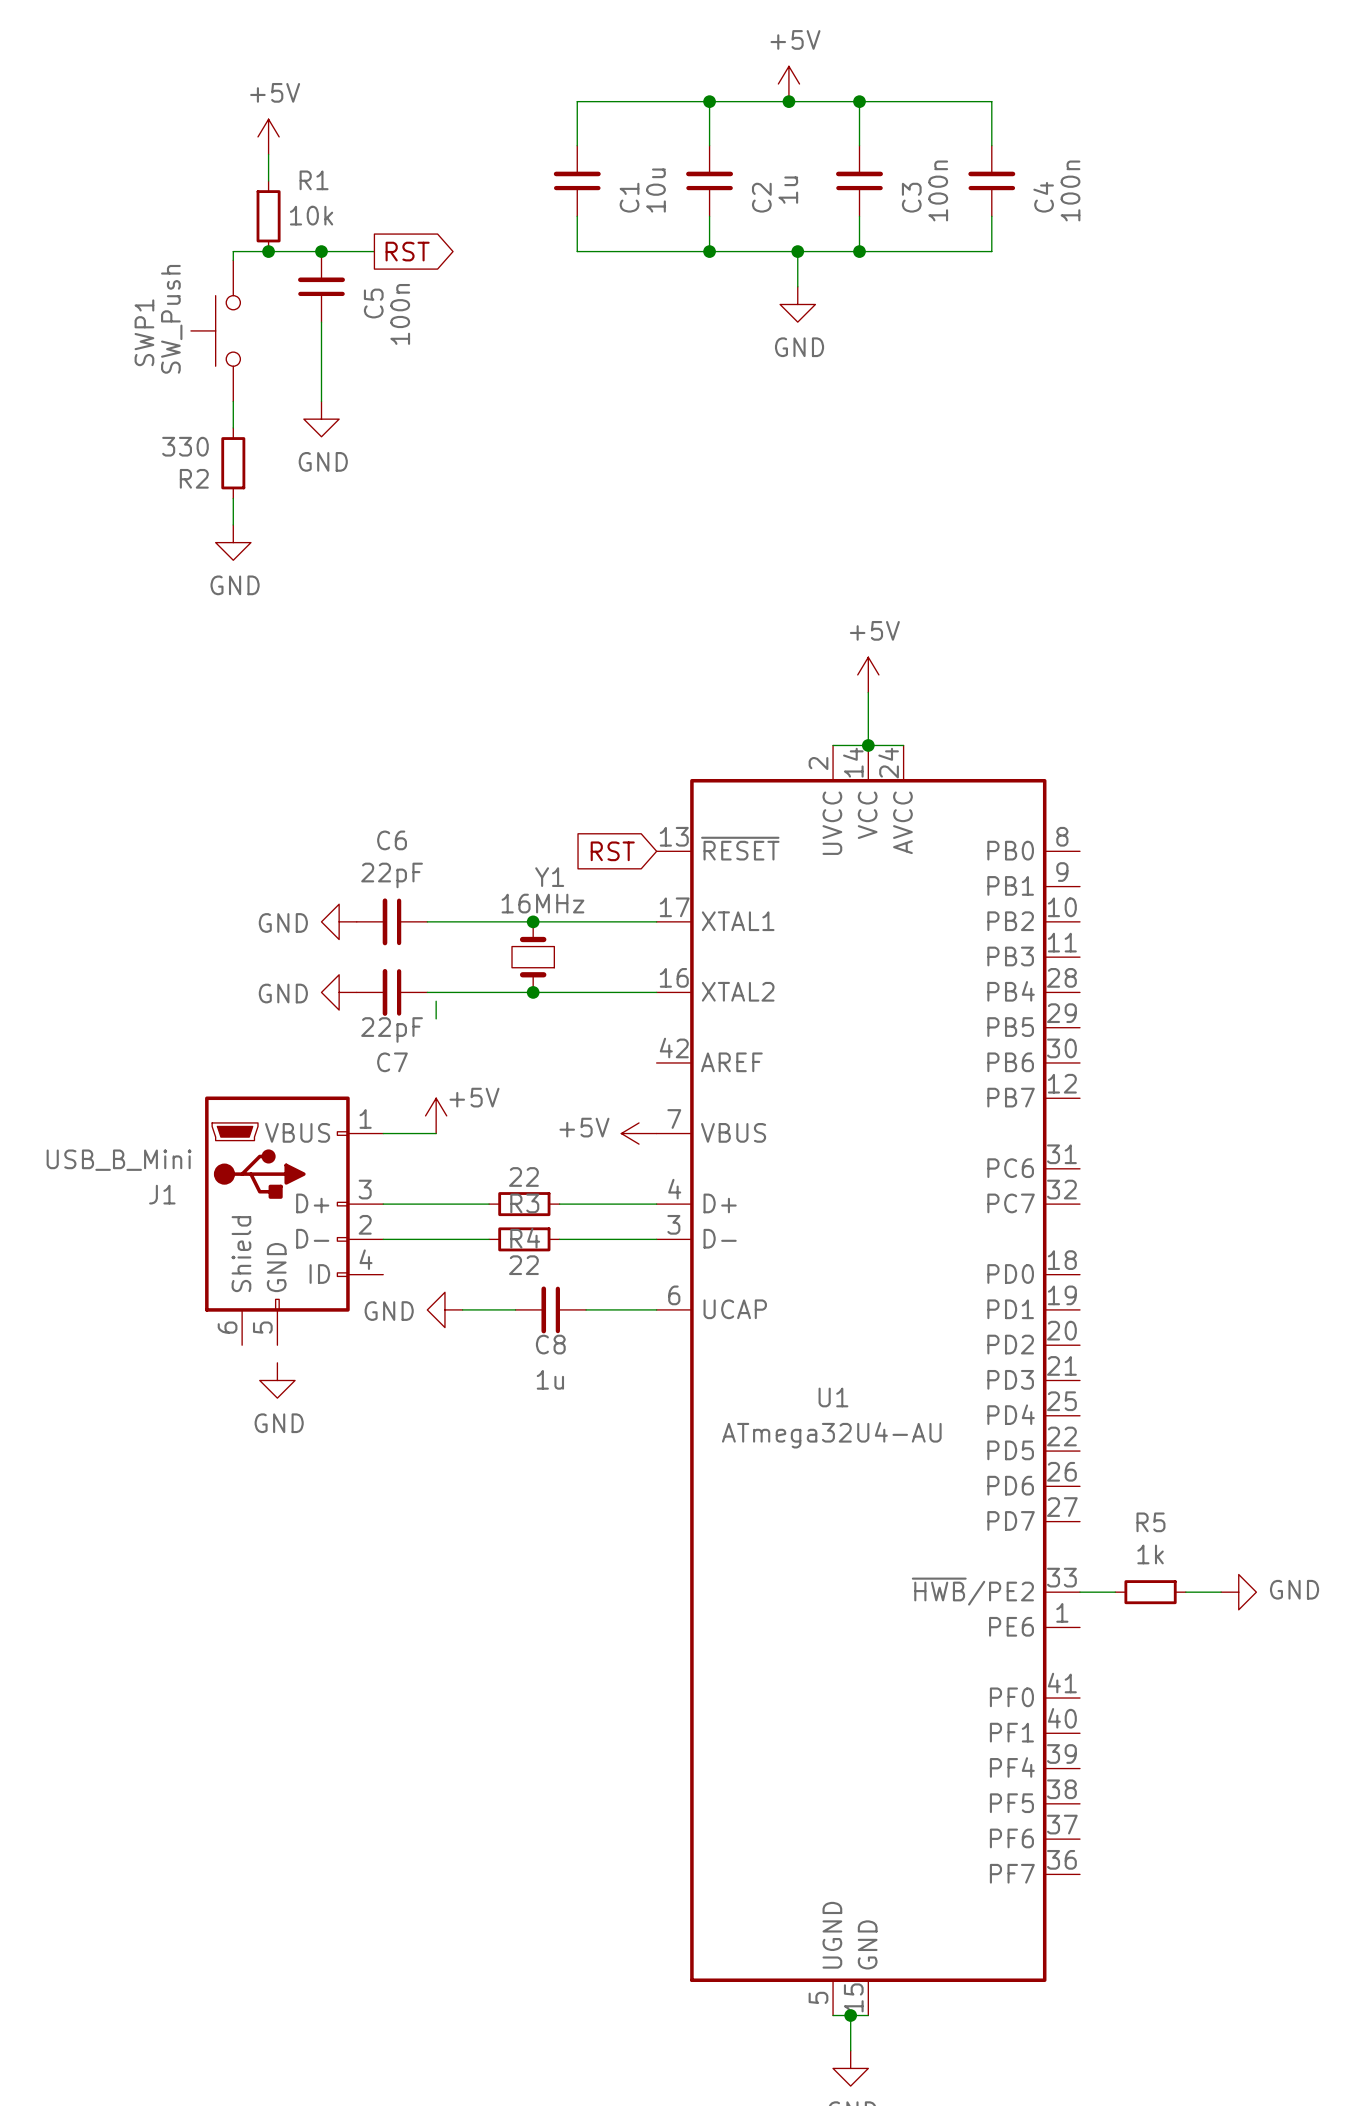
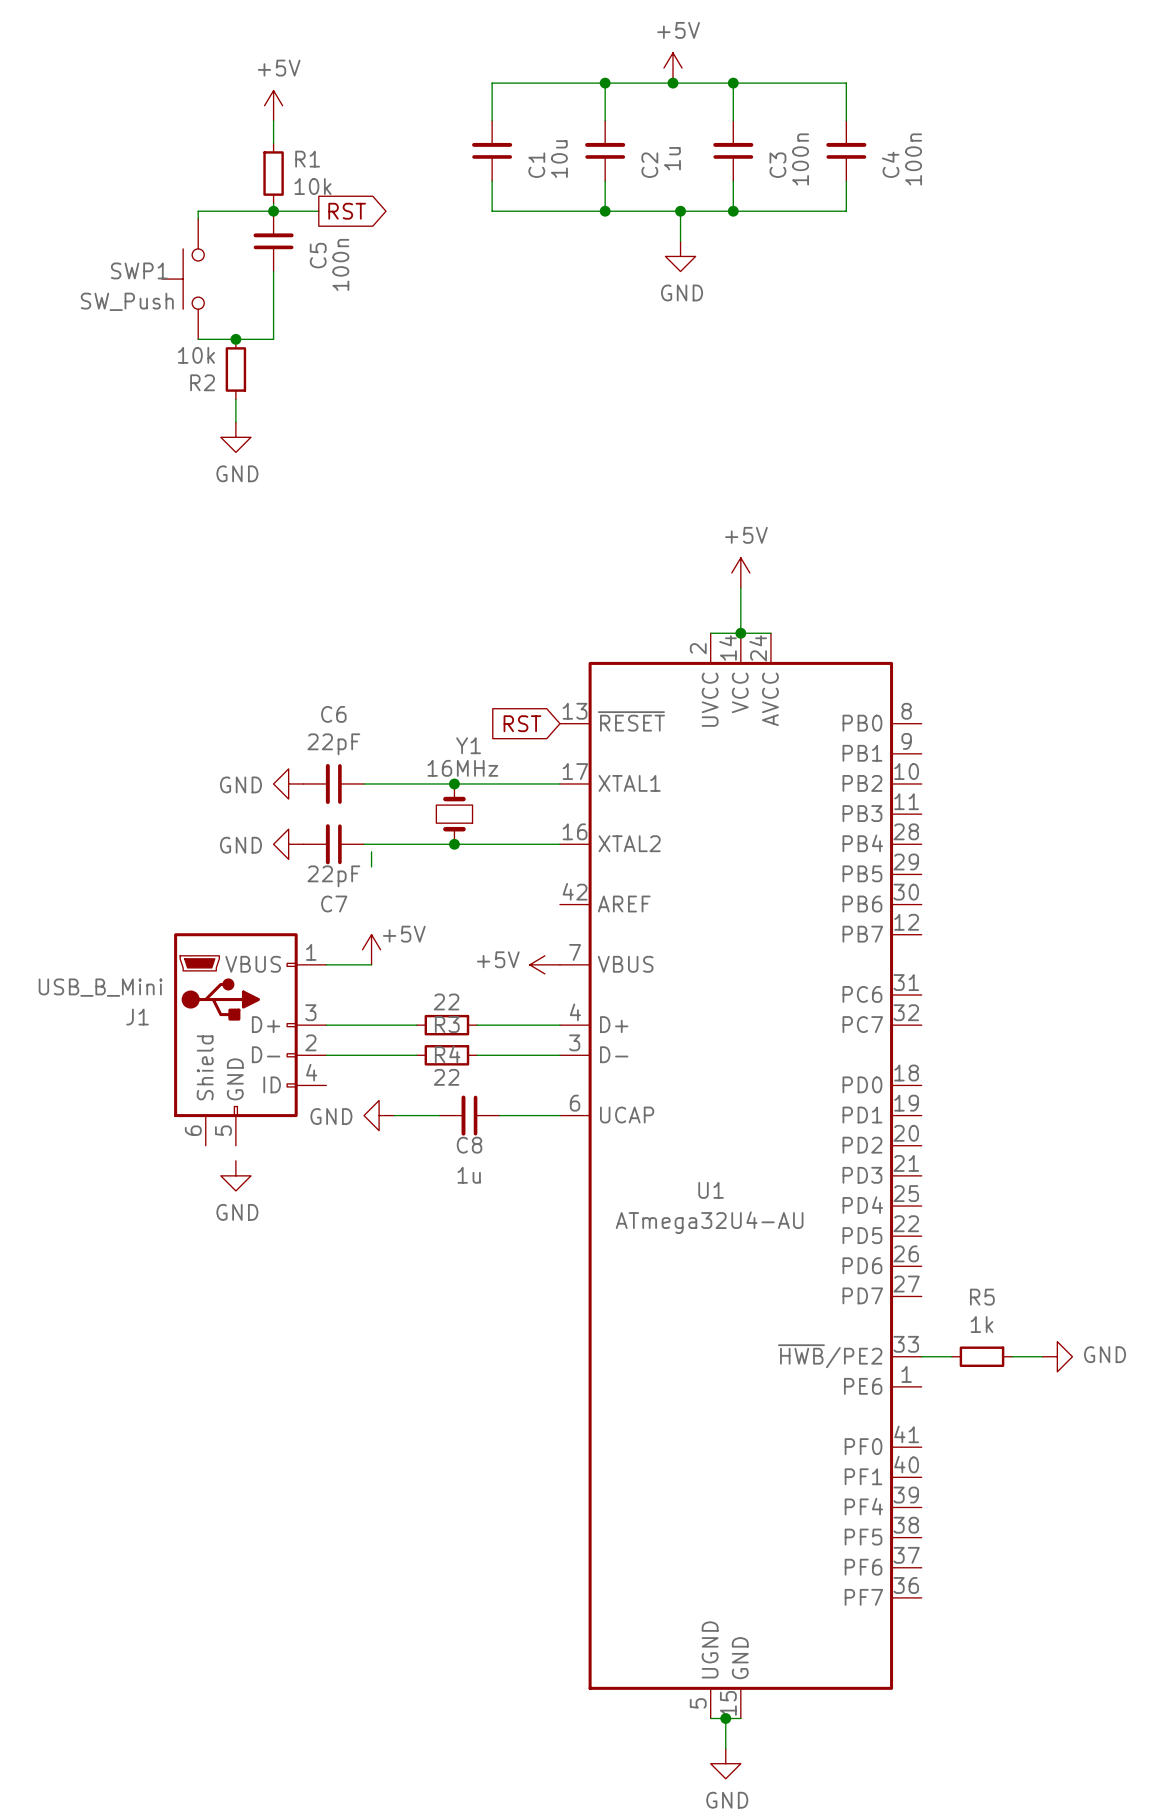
power symbol position: +5V (268, 136) -> +5V (273, 105)
wire: (268, 154) (268, 181) -> (273, 120) (273, 143)
R1 name position: R1 (314, 180) -> R1 (307, 159)
R1 value position: 10k (311, 215) -> 10k (313, 186)
R1 position: (268, 216) -> (273, 173)
junction: (268, 251) -> none
SWP1 value rotation: 0° (171, 319) -> 90° clockwise (127, 301)
SWP1 name rotation: 0° (144, 332) -> 90° clockwise (139, 270)
wire: (233, 401) (233, 427) -> (198, 339) (273, 339)
junction: none -> (235, 339)
power symbol: GND (321, 419) -> none
R2 value: 330 (185, 446) -> 10k (196, 355)
R2 position: (233, 463) -> (235, 369)
wire: (233, 498) (233, 524) -> (235, 399) (235, 422)
power symbol position: GND (233, 542) -> GND (235, 437)

